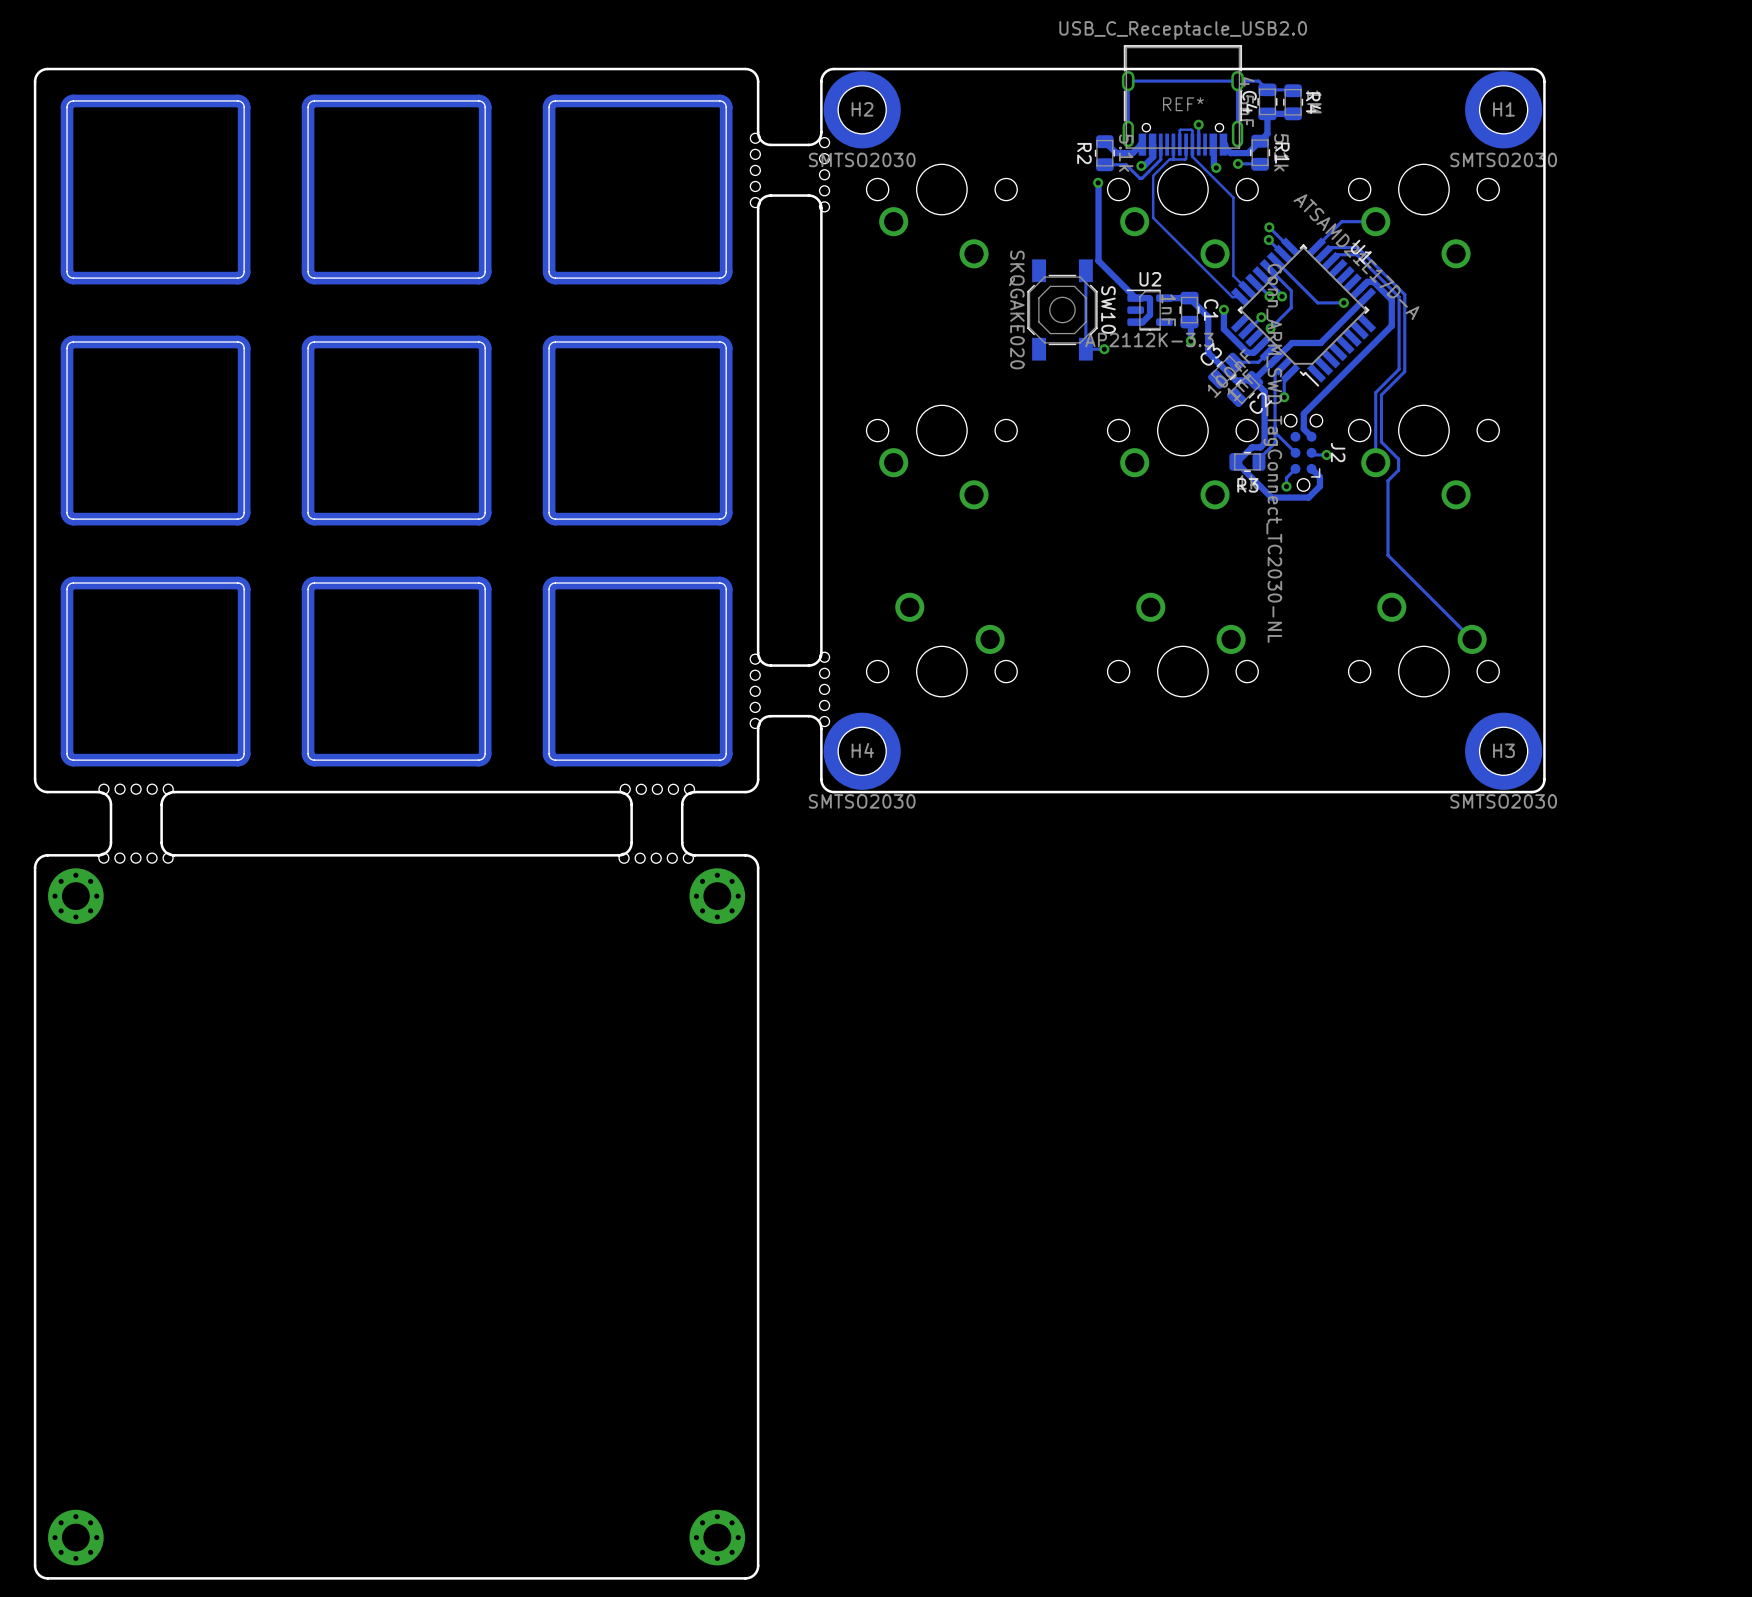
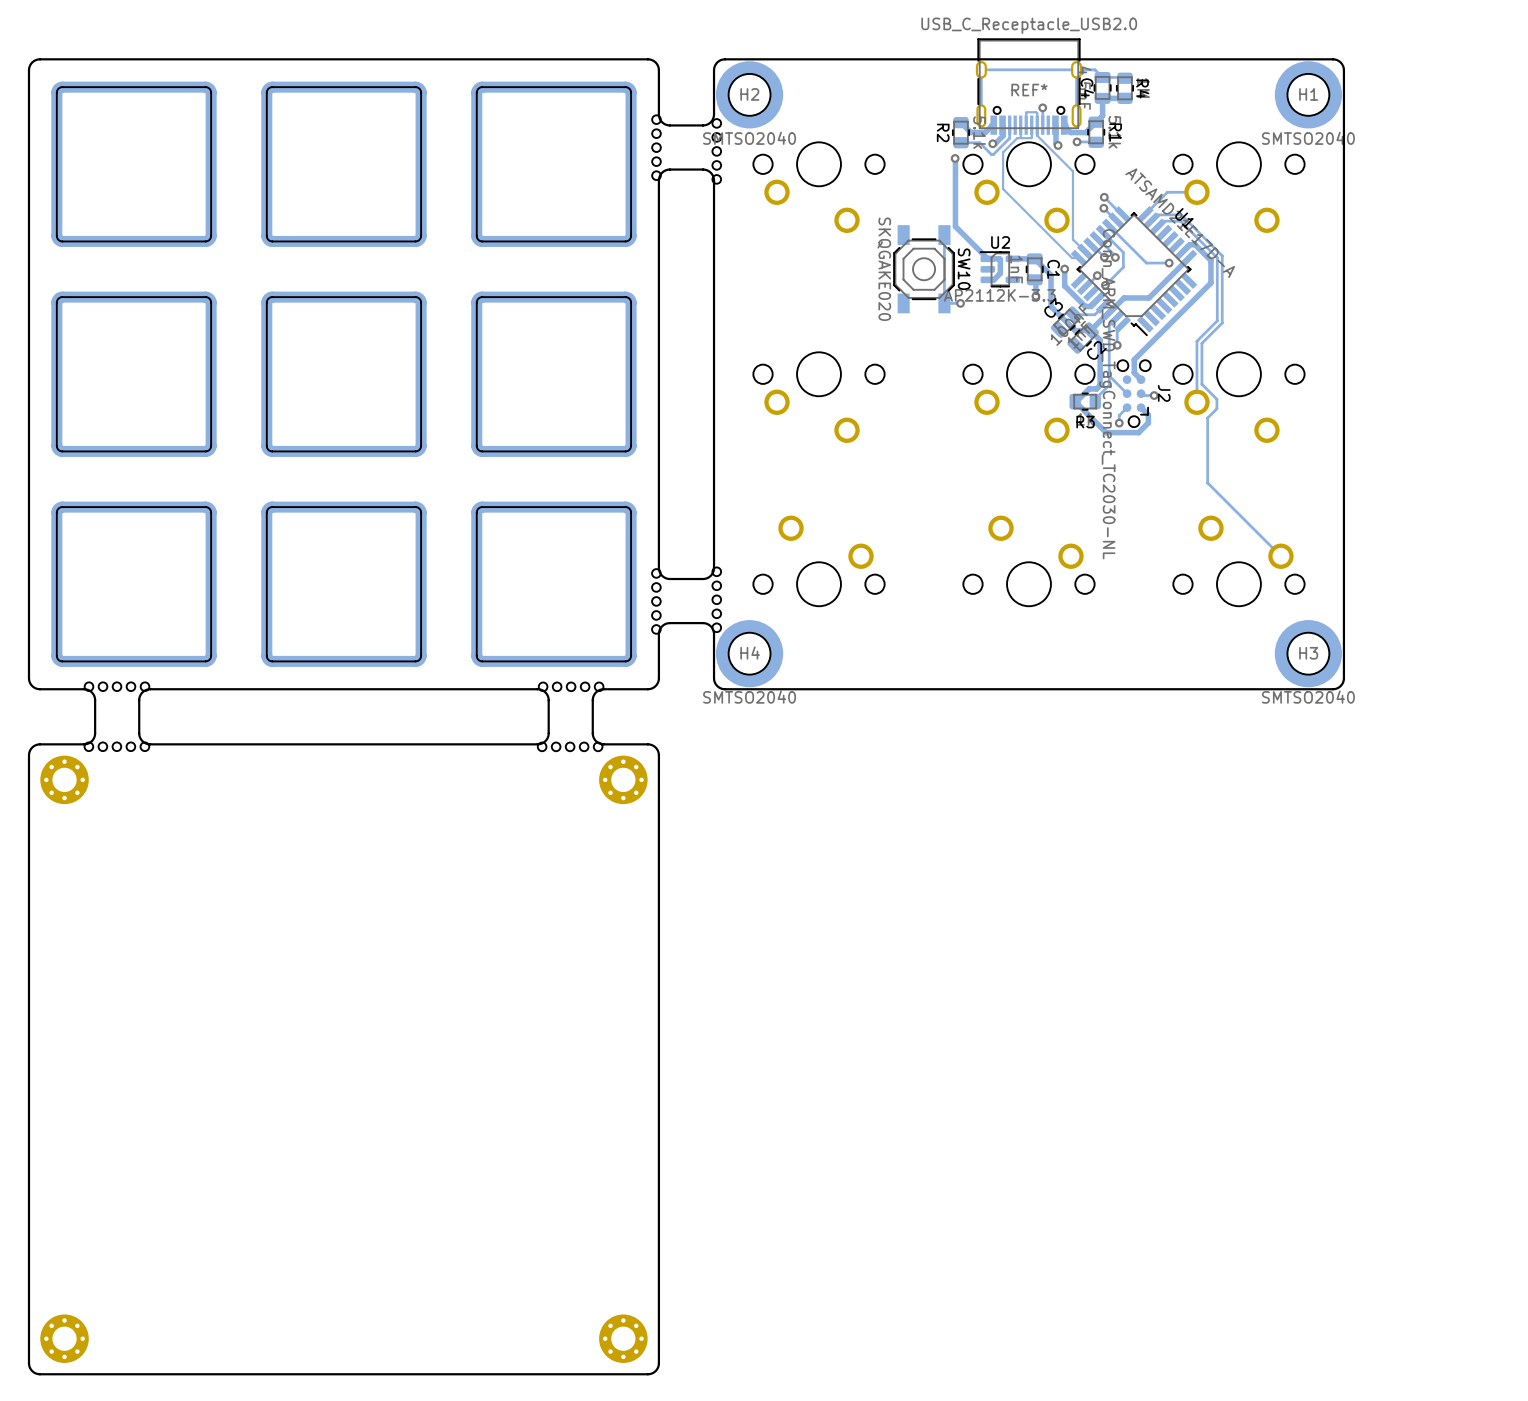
H2 value: SMTSO2030 (862, 159) -> SMTSO2040 (749, 138)
H1 value: SMTSO2030 (1503, 159) -> SMTSO2040 (1308, 138)
H4 value: SMTSO2030 (862, 801) -> SMTSO2040 (749, 697)
H3 value: SMTSO2030 (1503, 801) -> SMTSO2040 (1308, 697)

